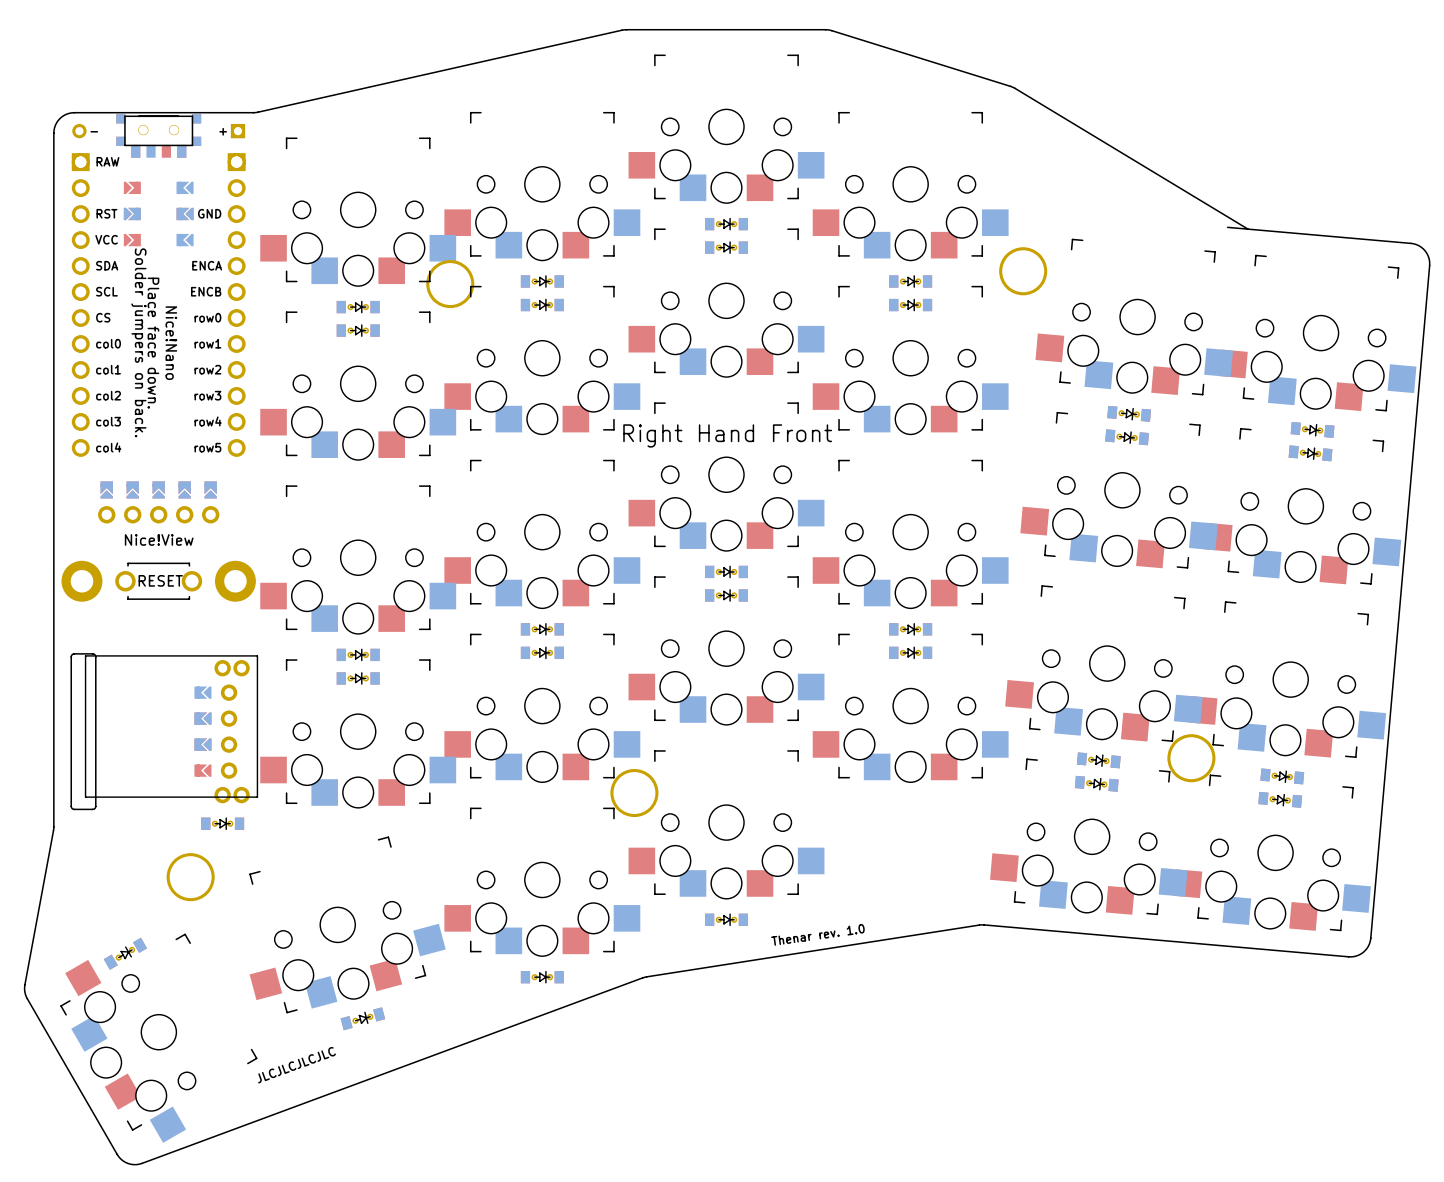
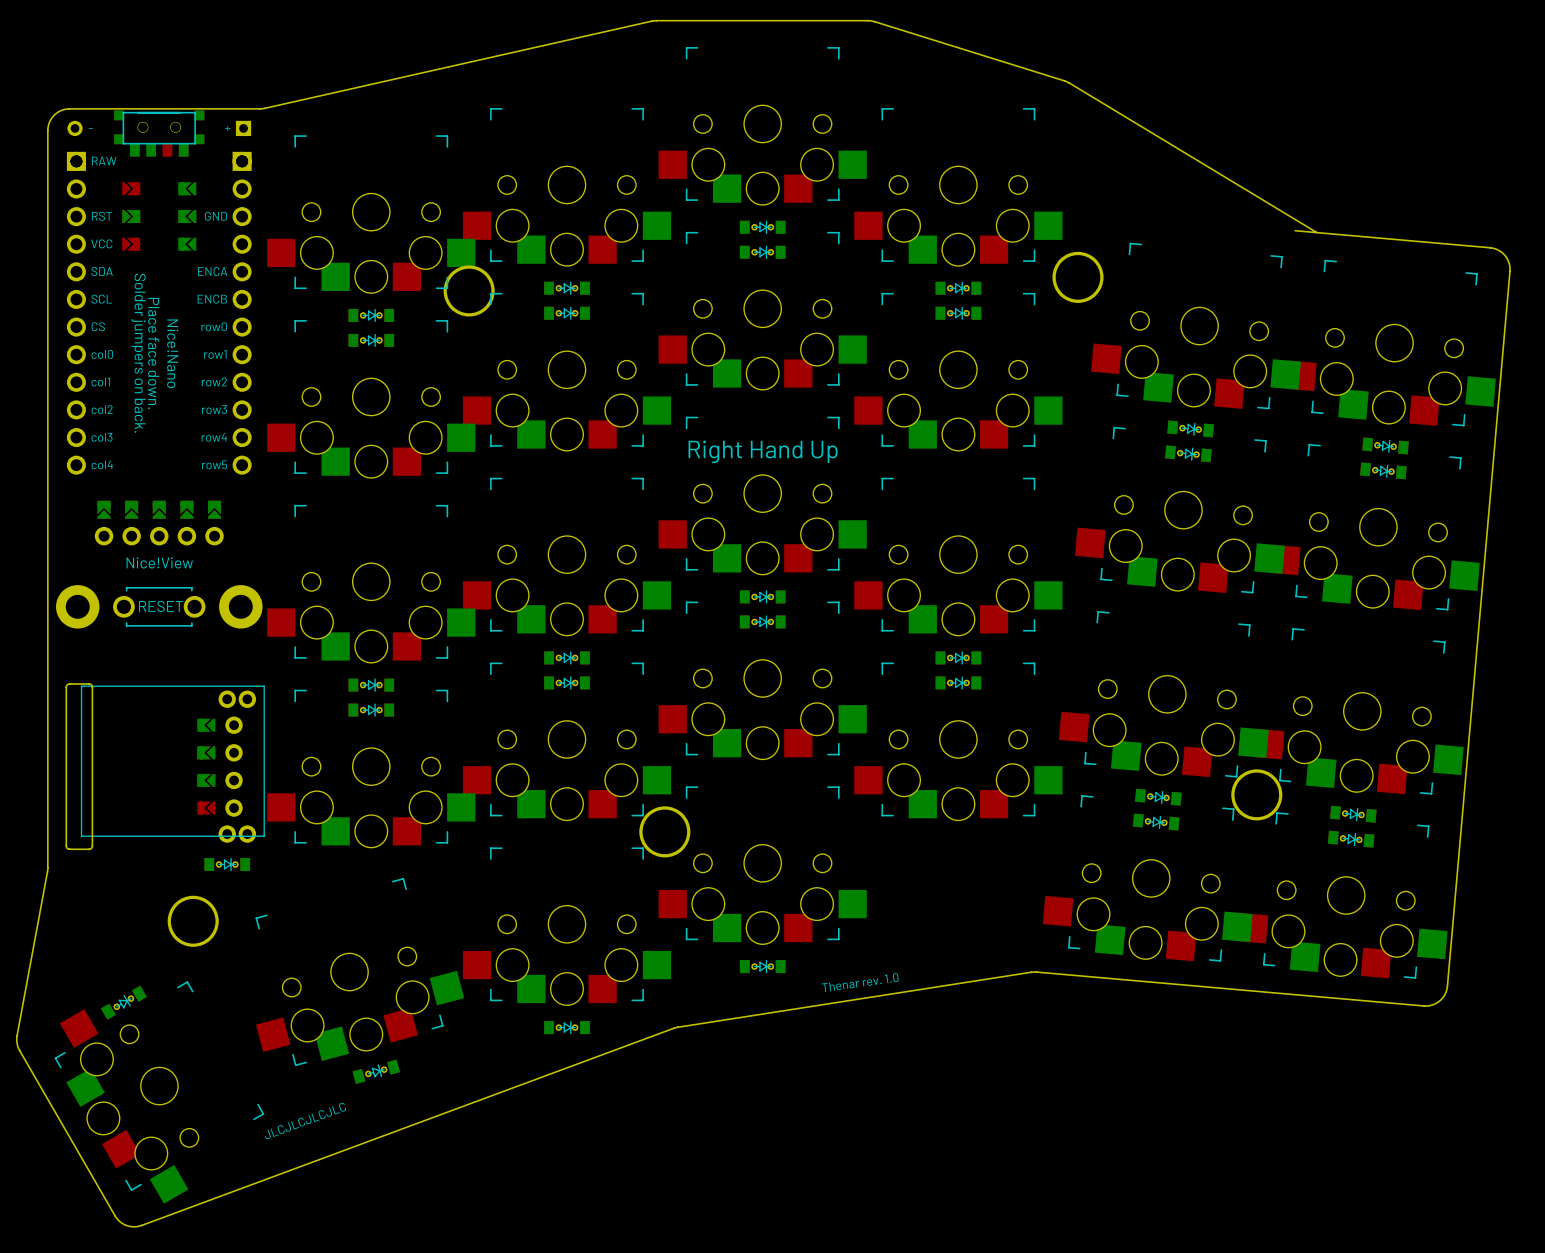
drawing shape: [623, 424, 833, 448] -> [688, 440, 838, 464]

